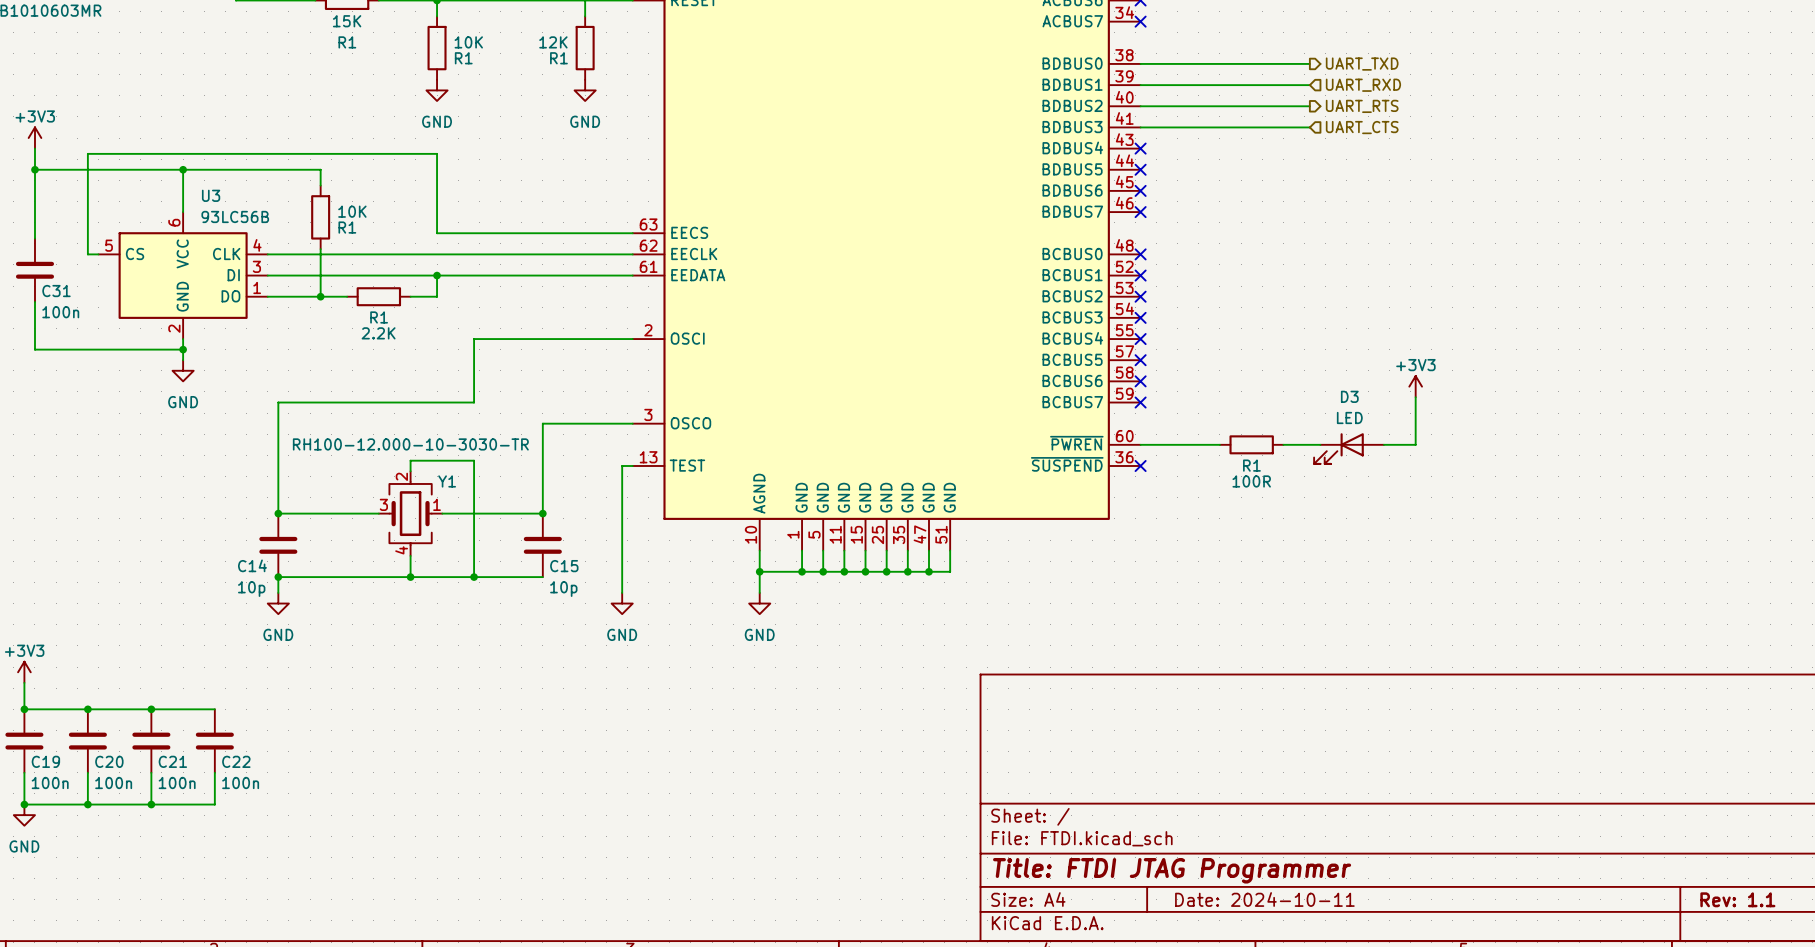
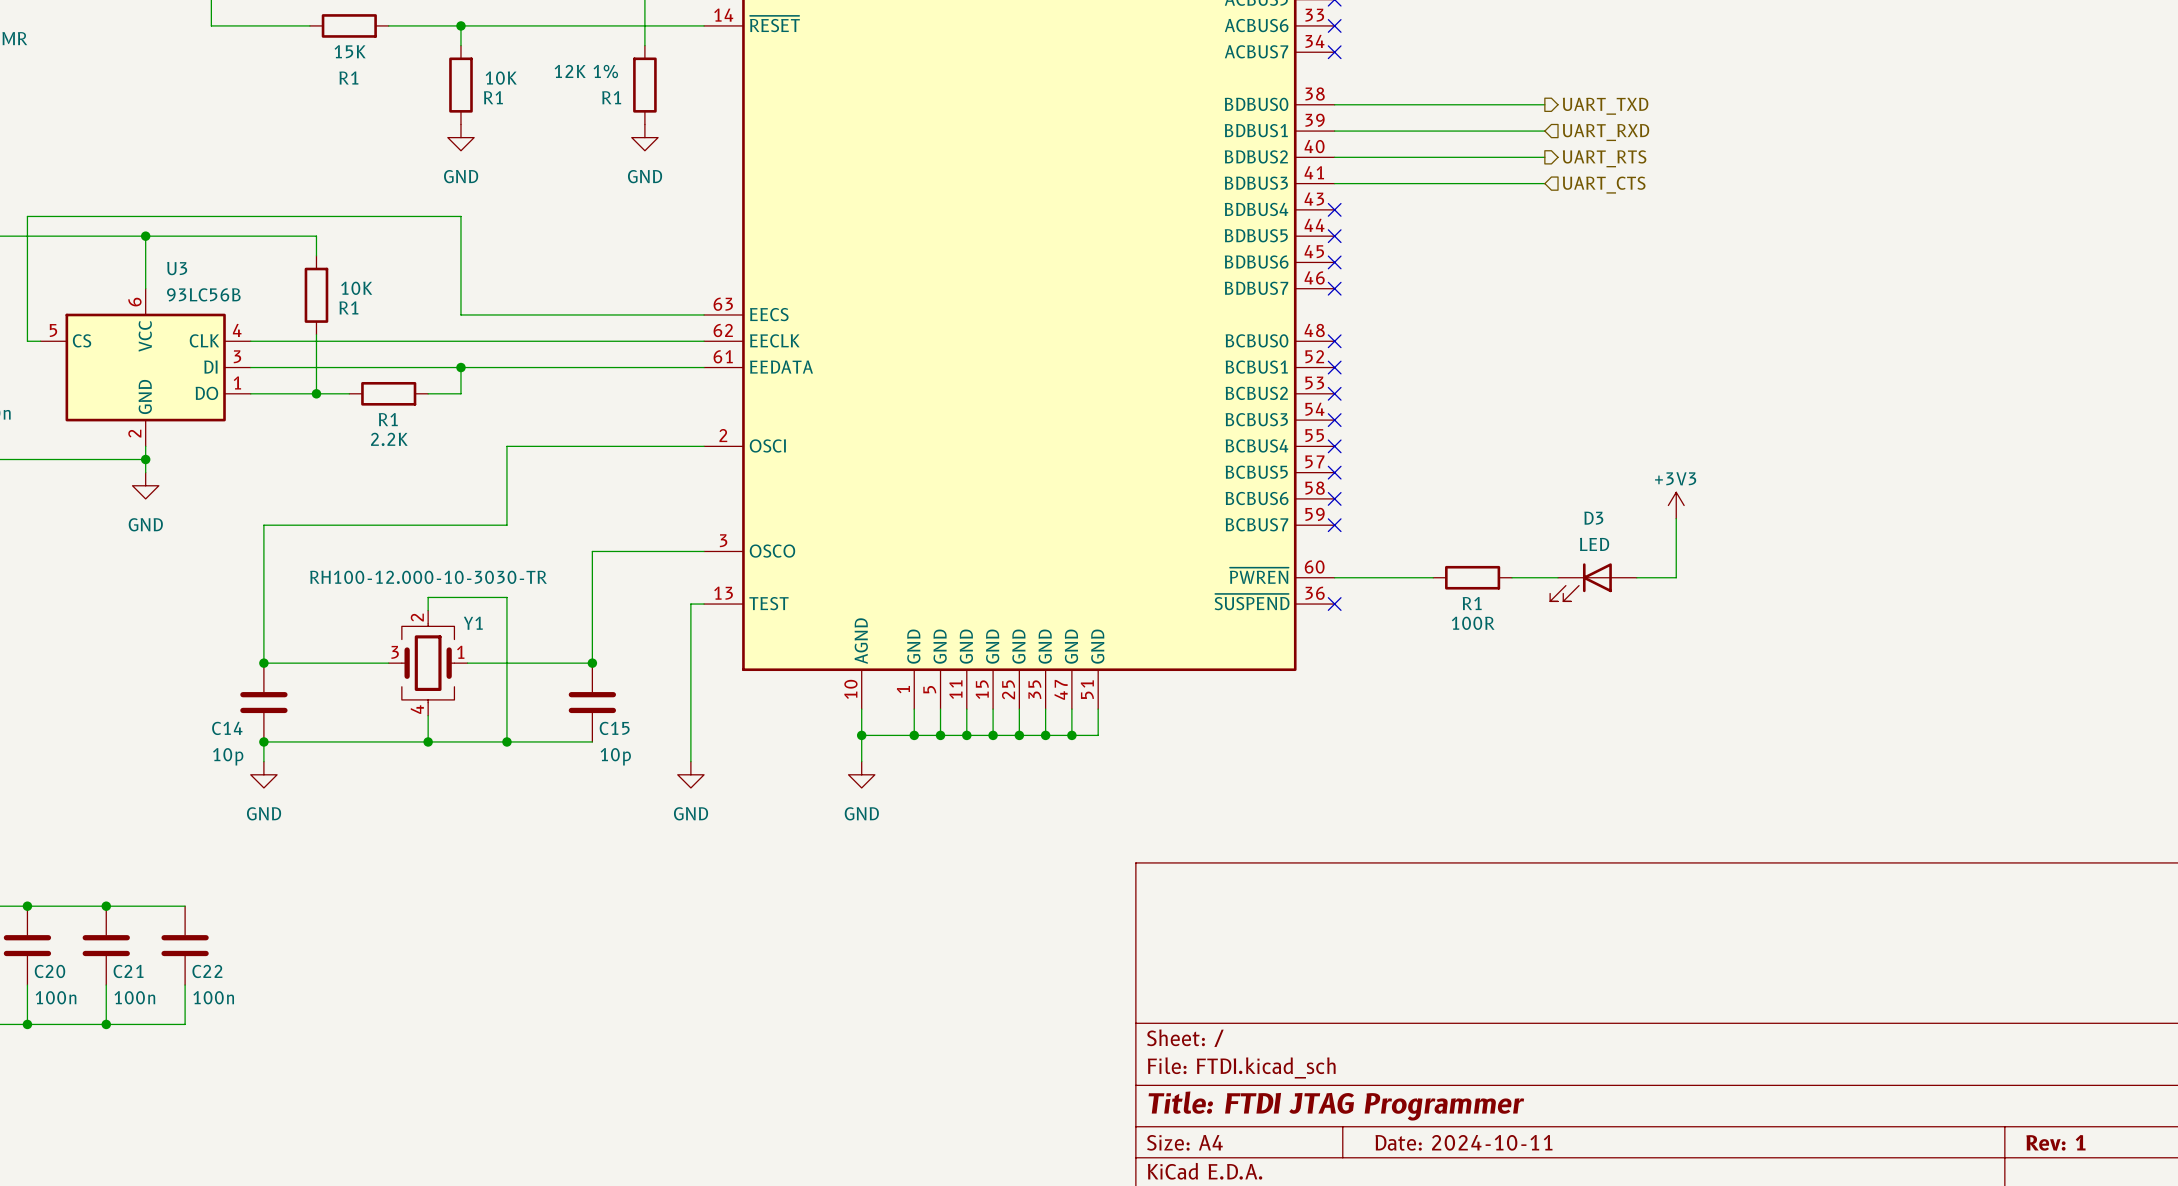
R1 value: 12K (553, 42) -> 12K 1% (586, 71)
title block: Rev: 1.1 (1737, 899) -> Rev: 1 (2055, 1142)

